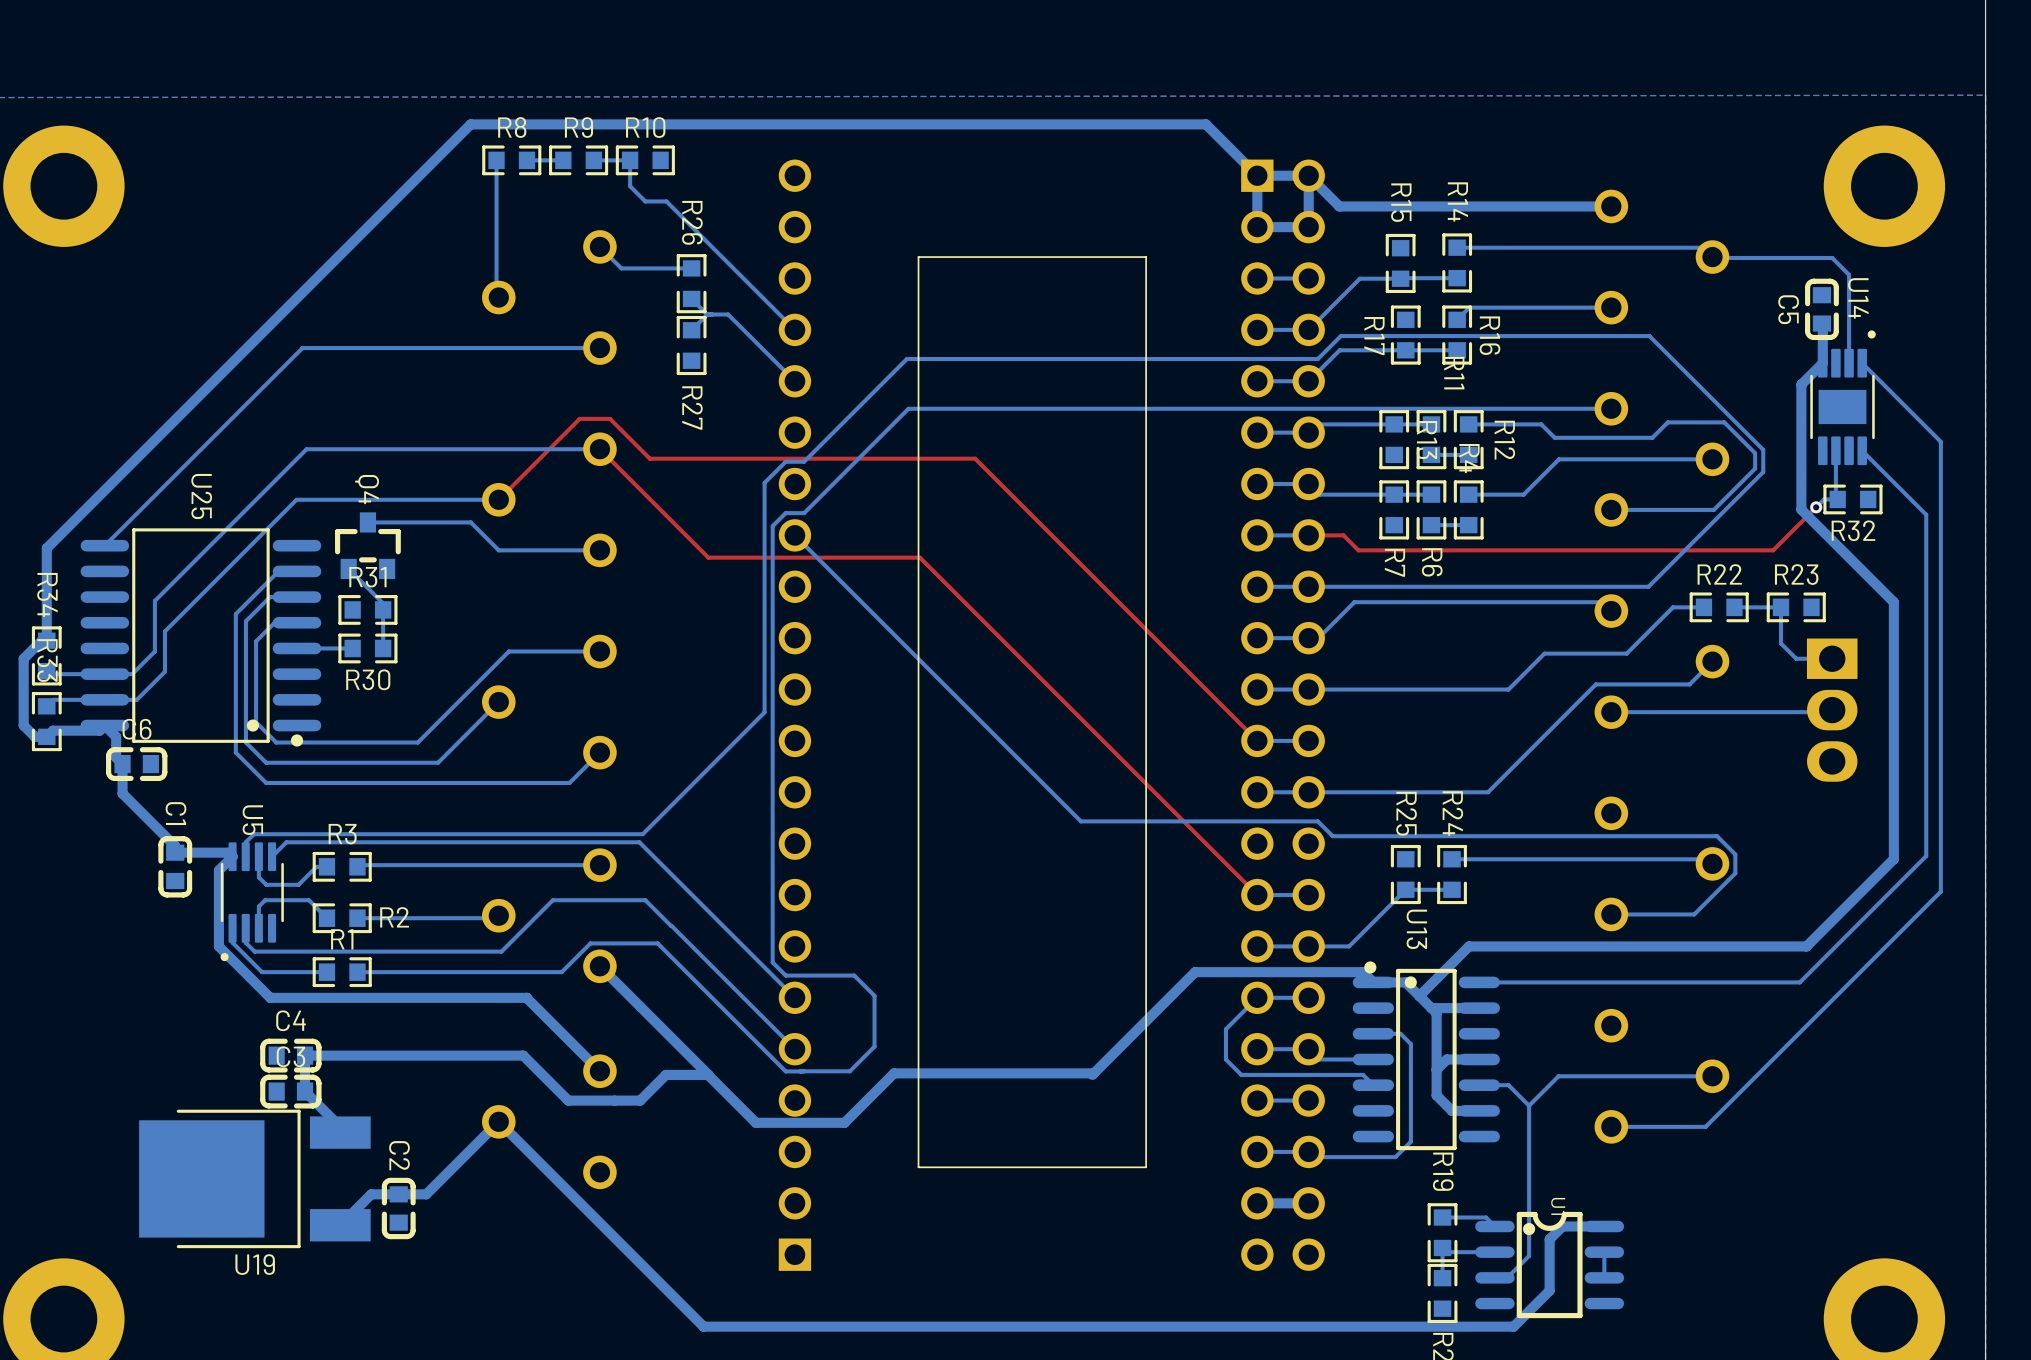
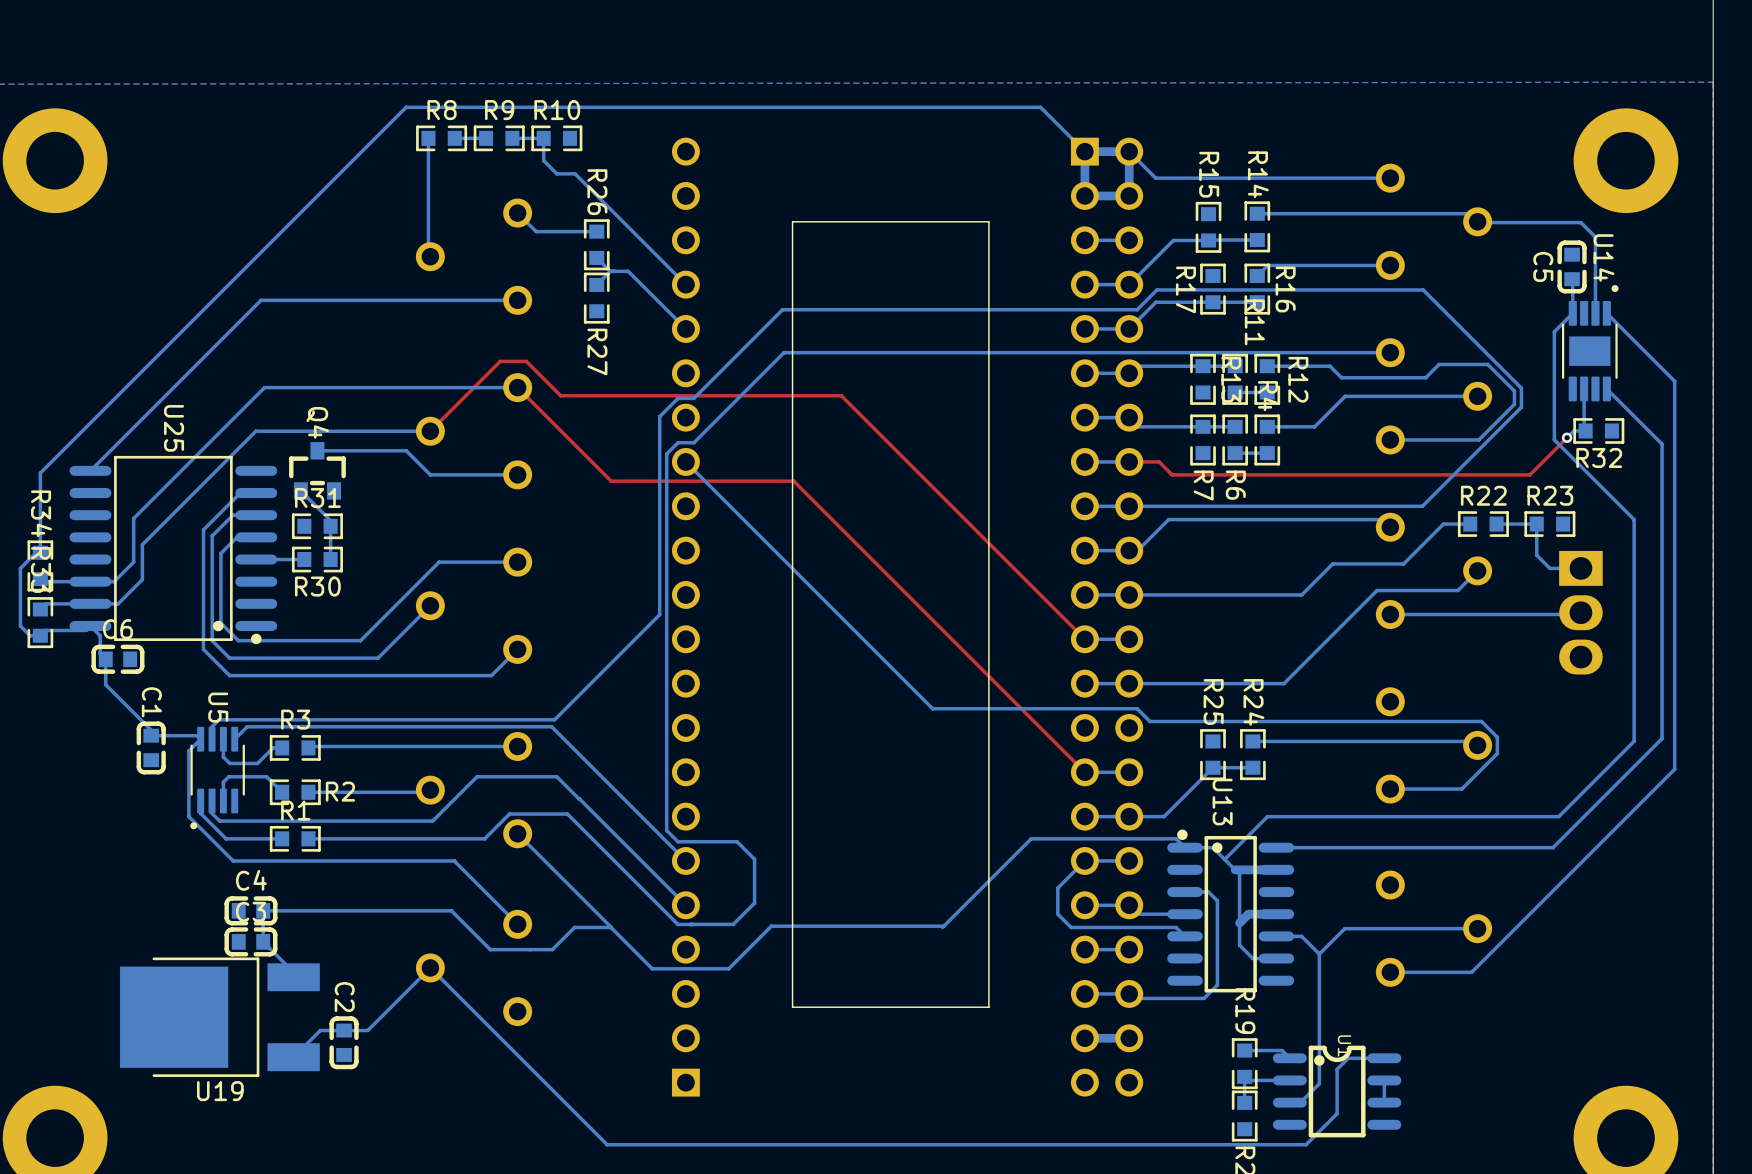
bottom track width: thick (1257, 175) (1206, 124) (470, 124) (46, 548) (46, 640) (41, 640) (23, 658) (23, 725) (34, 736) (46, 736) (52, 730) (99, 730) (104, 725) (116, 736) (116, 757) (122, 764) (122, 793) (175, 846) (175, 852) (228, 852) (232, 856) (218, 870) (218, 946) (270, 997) (527, 997) -> thin (1084, 151) (1040, 107) (406, 107) (40, 473) (40, 552) (36, 552) (20, 568) (20, 626) (30, 635) (40, 635) (45, 630) (86, 630) (90, 626) (100, 635) (100, 653) (105, 659) (105, 684) (151, 730) (151, 735) (197, 735) (200, 739) (188, 751) (188, 816) (233, 860) (454, 860)
bottom track width: thick (1308, 175) (1339, 206) (1611, 206) -> thin (1129, 151) (1155, 178) (1390, 178)
bottom track width: thick (1821, 323) (1822, 363) (1801, 384) (1801, 509) (1893, 602) (1893, 859) (1806, 946) (1468, 946) (1419, 996) -> thin (1572, 279) (1572, 313) (1554, 331) (1554, 439) (1634, 519) (1634, 741) (1558, 816) (1267, 816) (1224, 859)
bottom track width: thick (599, 966) (708, 1074) (665, 1074) (640, 1100) (568, 1100) (523, 1055) (305, 1055) (305, 1091) (340, 1126) (340, 1132) -> thin (517, 833) (611, 927) (574, 927) (552, 949) (490, 949) (451, 910) (263, 910) (263, 941) (293, 972) (293, 977)
bottom track width: thick (526, 997) (599, 1071) -> thin (454, 860) (517, 924)
bottom track width: thick (1093, 1073) (894, 1073) (844, 1122) (755, 1122) (708, 1074) -> thin (943, 926) (771, 926) (728, 968) (652, 968) (610, 927)
bottom track width: thick (1092, 1074) (1195, 972) (1363, 972) (1373, 982) (1405, 982) (1436, 1013) (1436, 1095) (1452, 1110) (1479, 1110) -> thin (942, 927) (1031, 838) (1176, 838) (1185, 847) (1212, 847) (1239, 874) (1239, 945) (1252, 958) (1276, 958)
bottom track width: thick (340, 1225) (371, 1194) (426, 1194) (498, 1121) (703, 1326) (1513, 1326) (1549, 1290) (1549, 1239) (1562, 1226) (1604, 1226) -> thin (293, 1057) (320, 1030) (367, 1030) (430, 967) (607, 1144) (1306, 1144) (1337, 1113) (1337, 1069) (1348, 1058) (1384, 1058)

